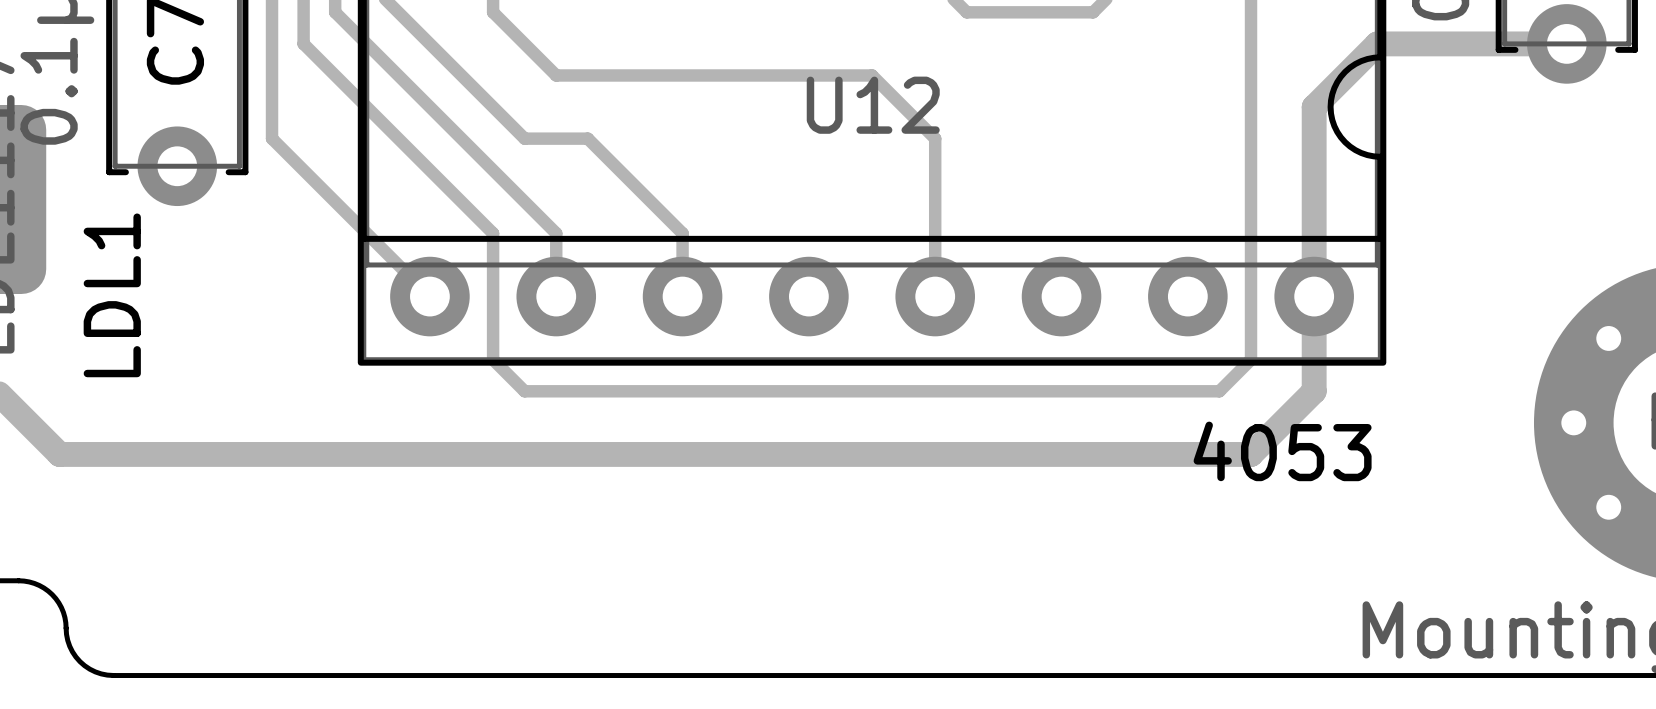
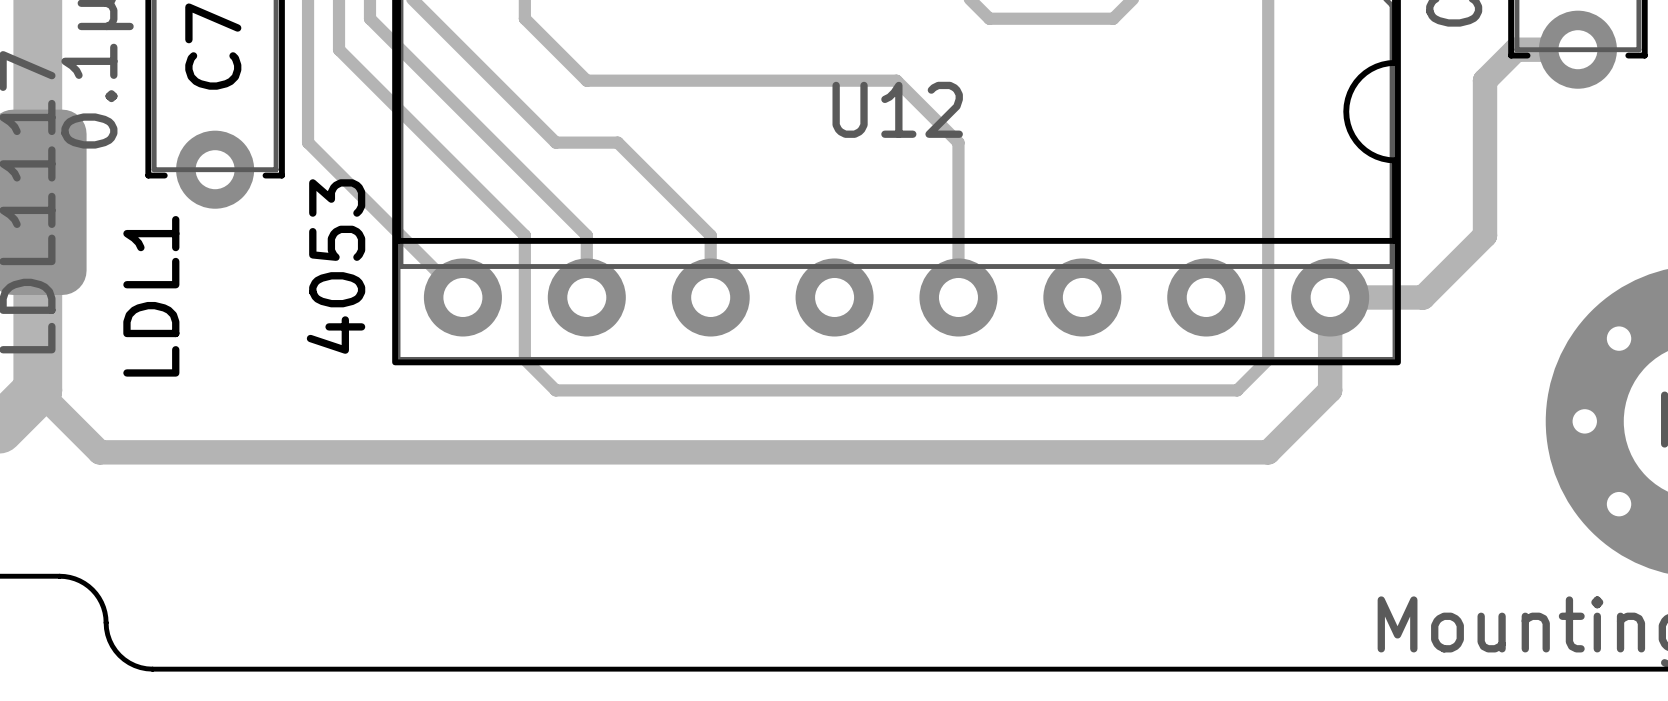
track: (1503, 43) (1377, 43) (1314, 107) (1314, 296) -> (1515, 49) (1485, 80) (1485, 235) (1423, 297) (1330, 297)
U12 value rotation: 0° (1282, 451) -> 90° counterclockwise (336, 266)
U12 value position: 4053 (1282, 451) -> 4053 (336, 266)

